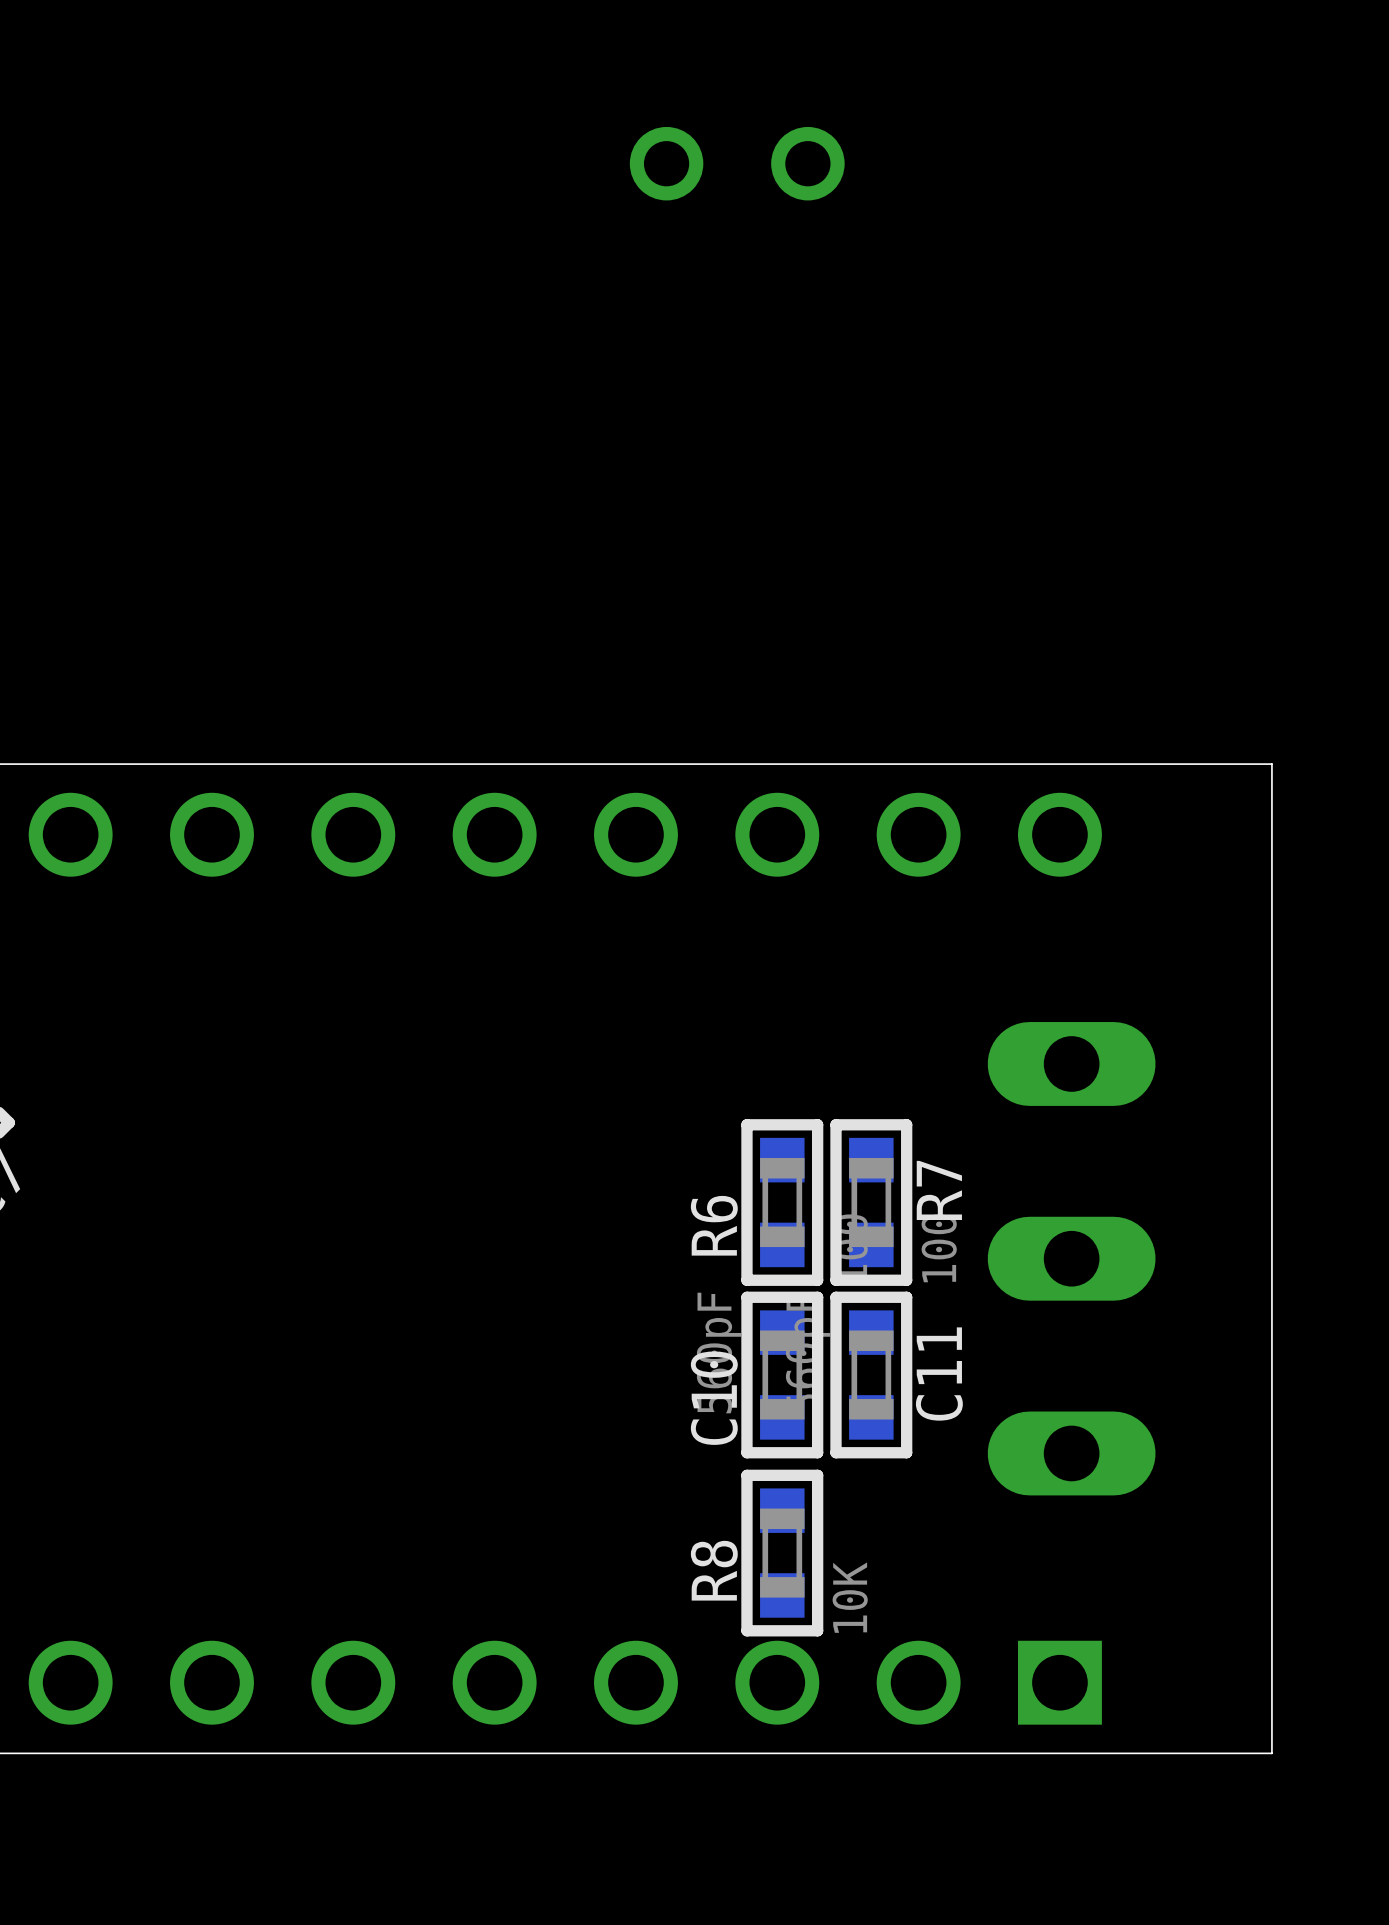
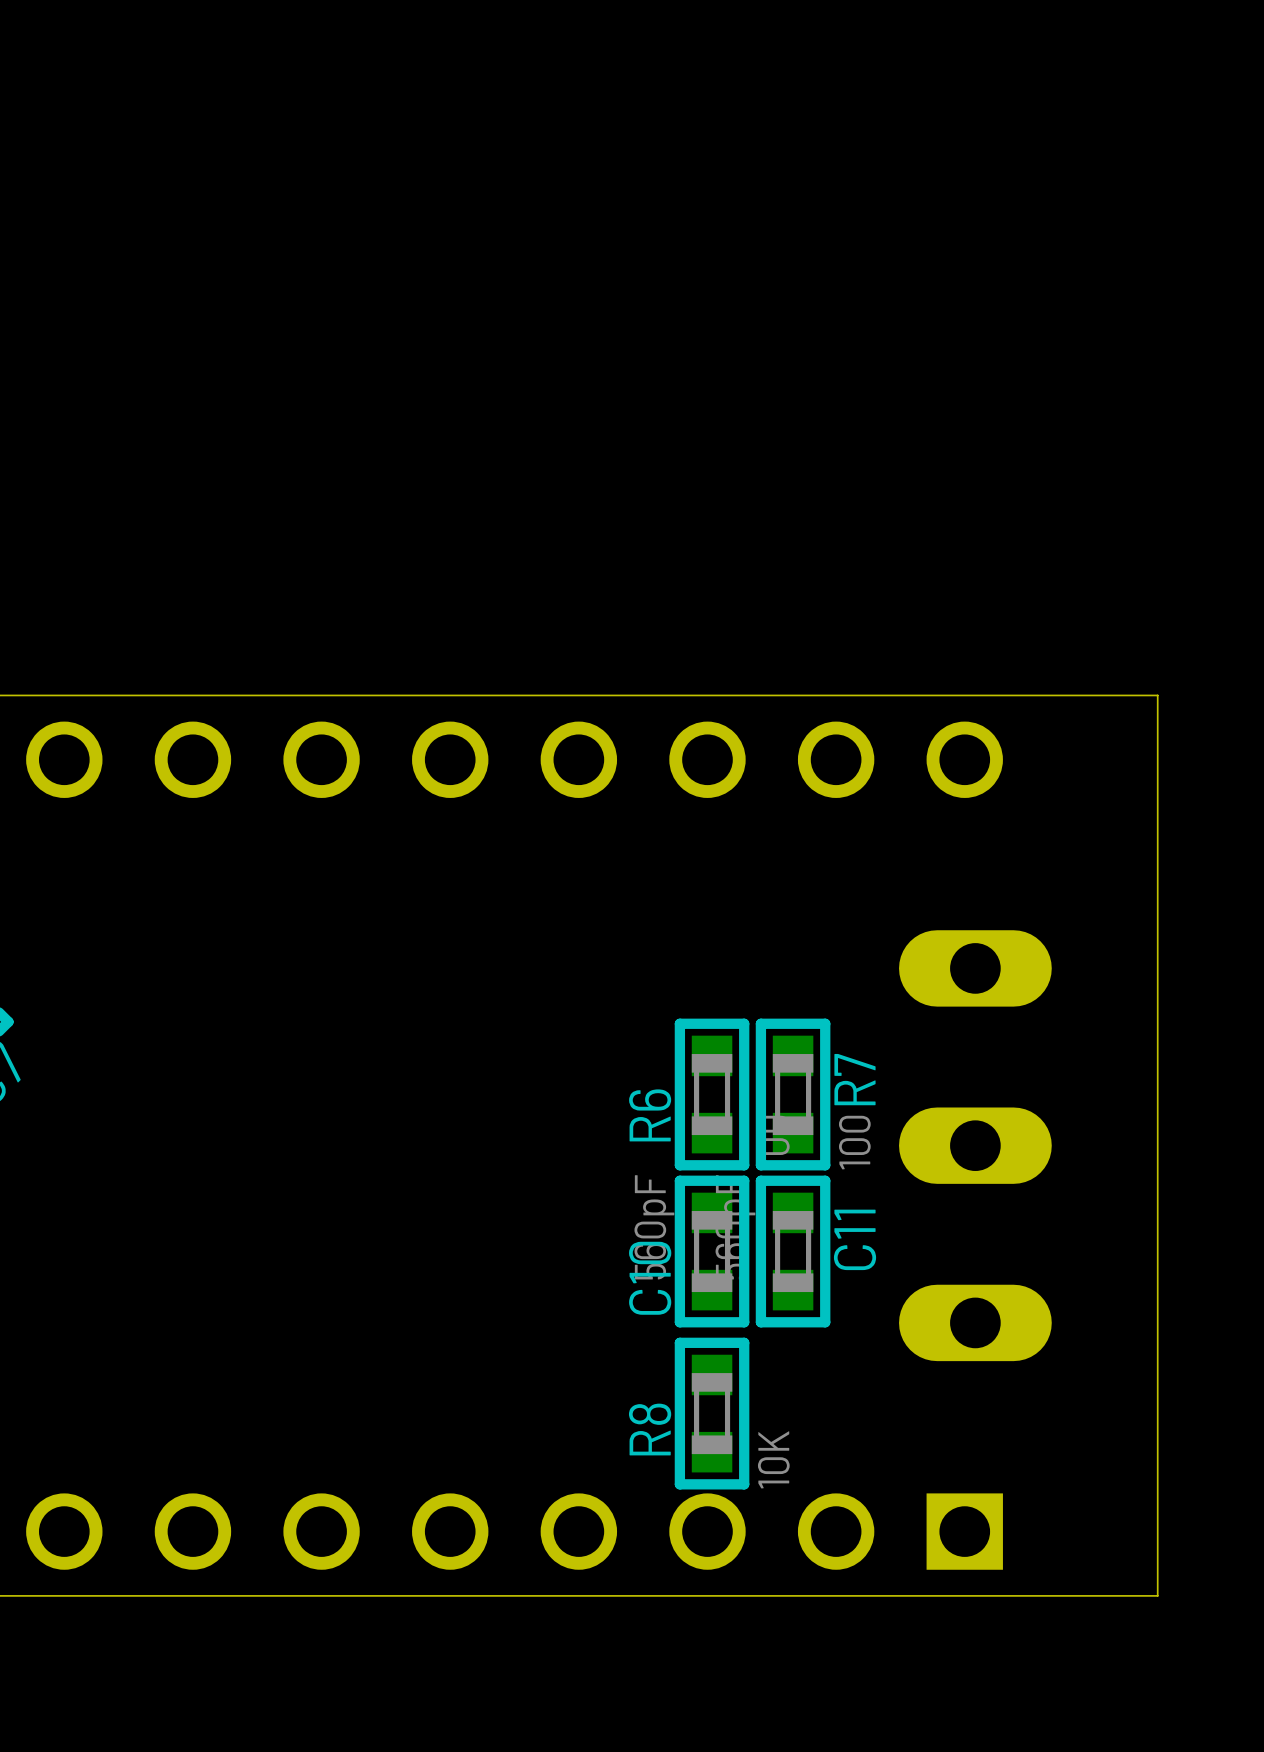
part: (737, 163) -> none

